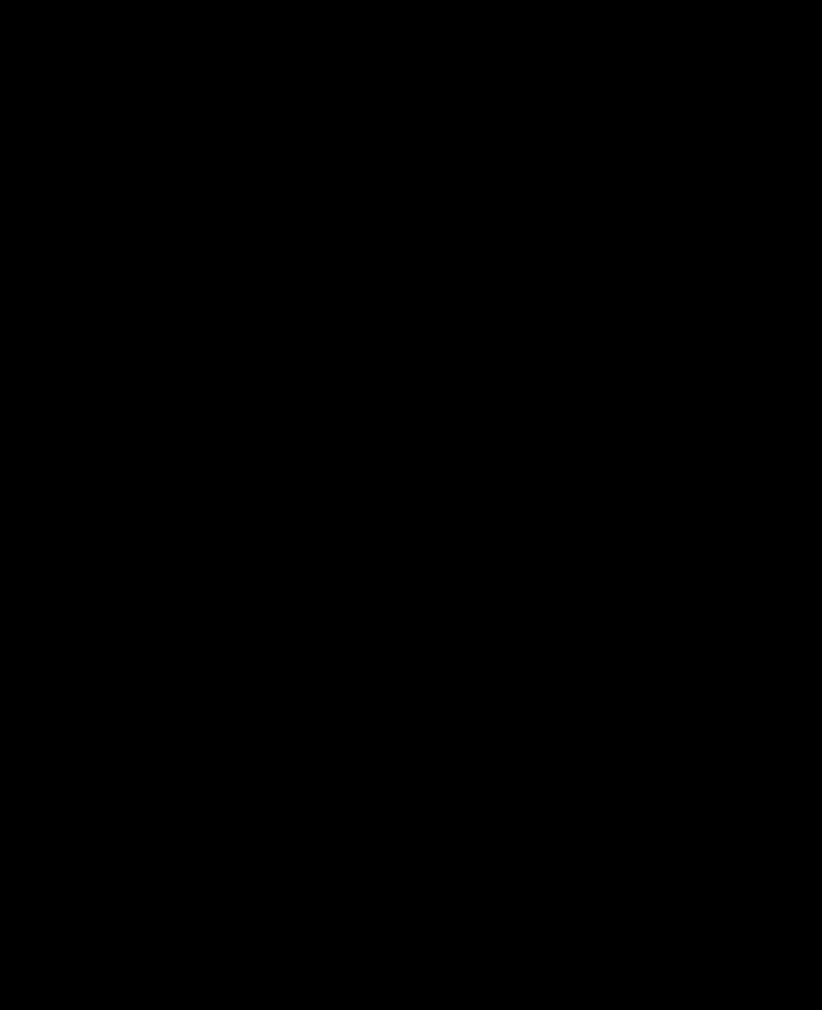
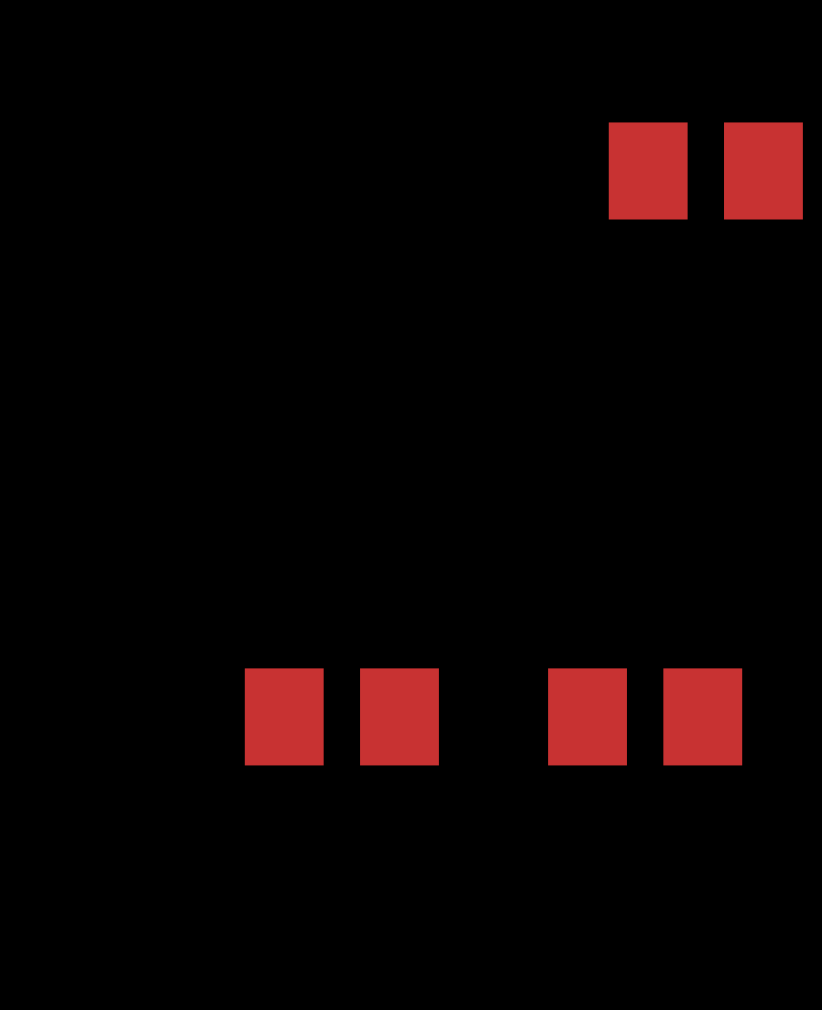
part: none -> (705, 170)
part: none -> (341, 716)
part: none -> (645, 716)

